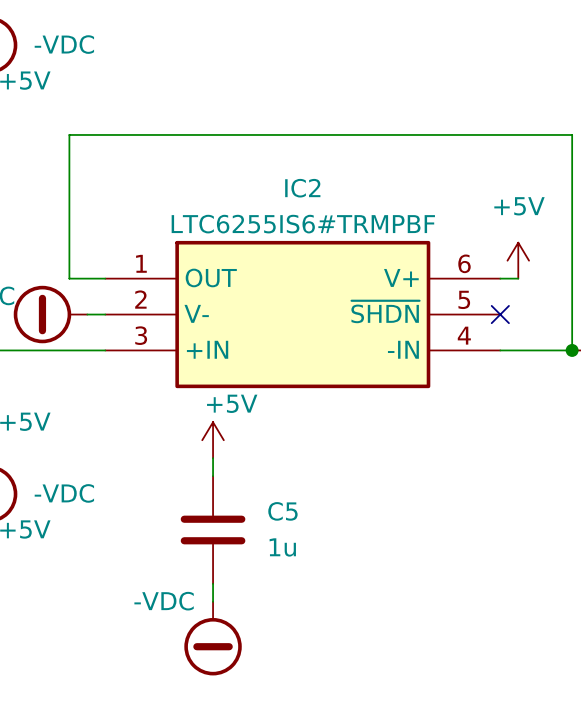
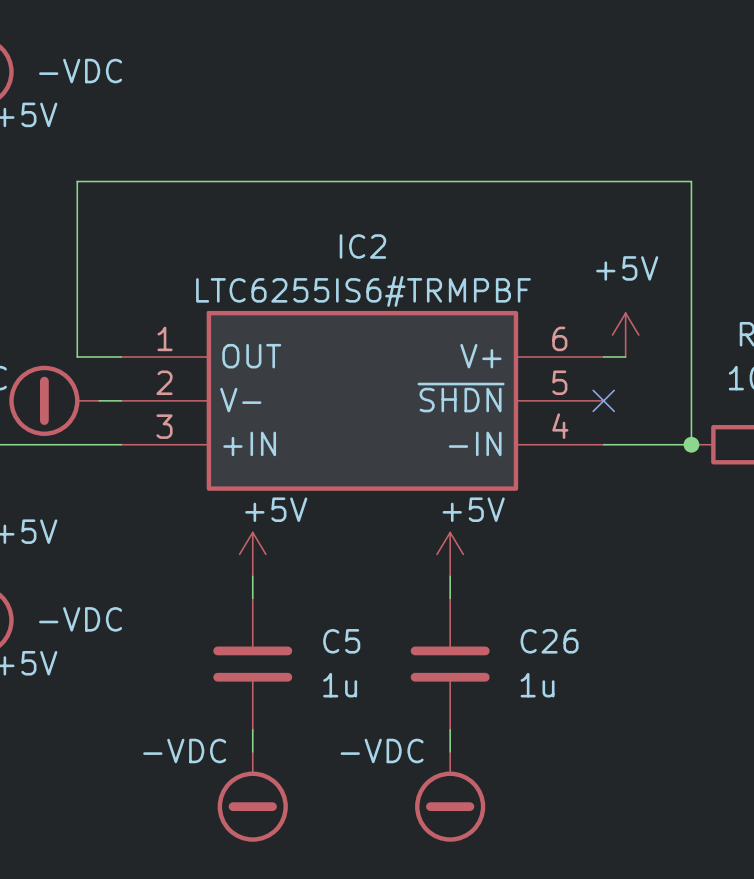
power symbol: none -> +5V (450, 554)
wire: none -> (450, 576) (450, 598)
C26: none -> 1u (450, 664)
wire: none -> (450, 729) (450, 751)
power symbol: none -> -VDC (450, 796)

